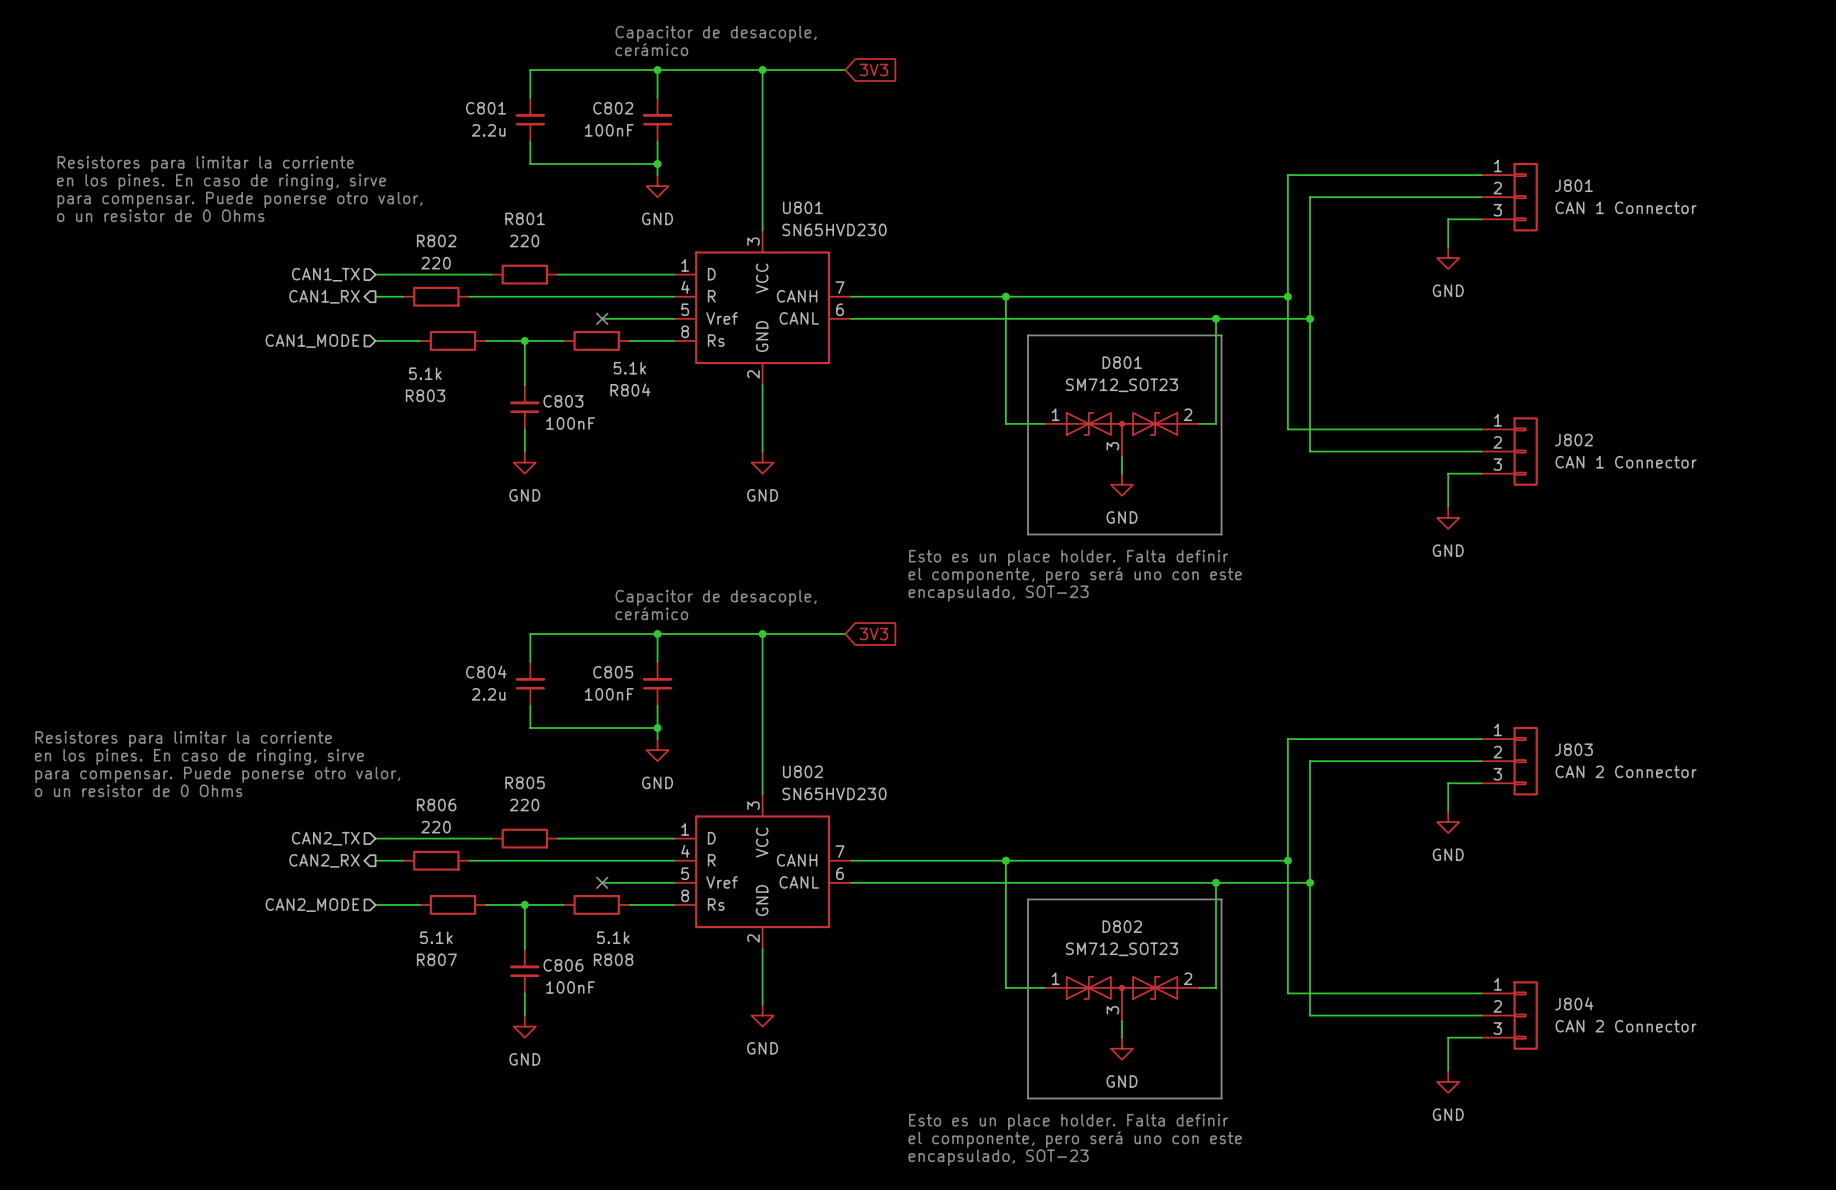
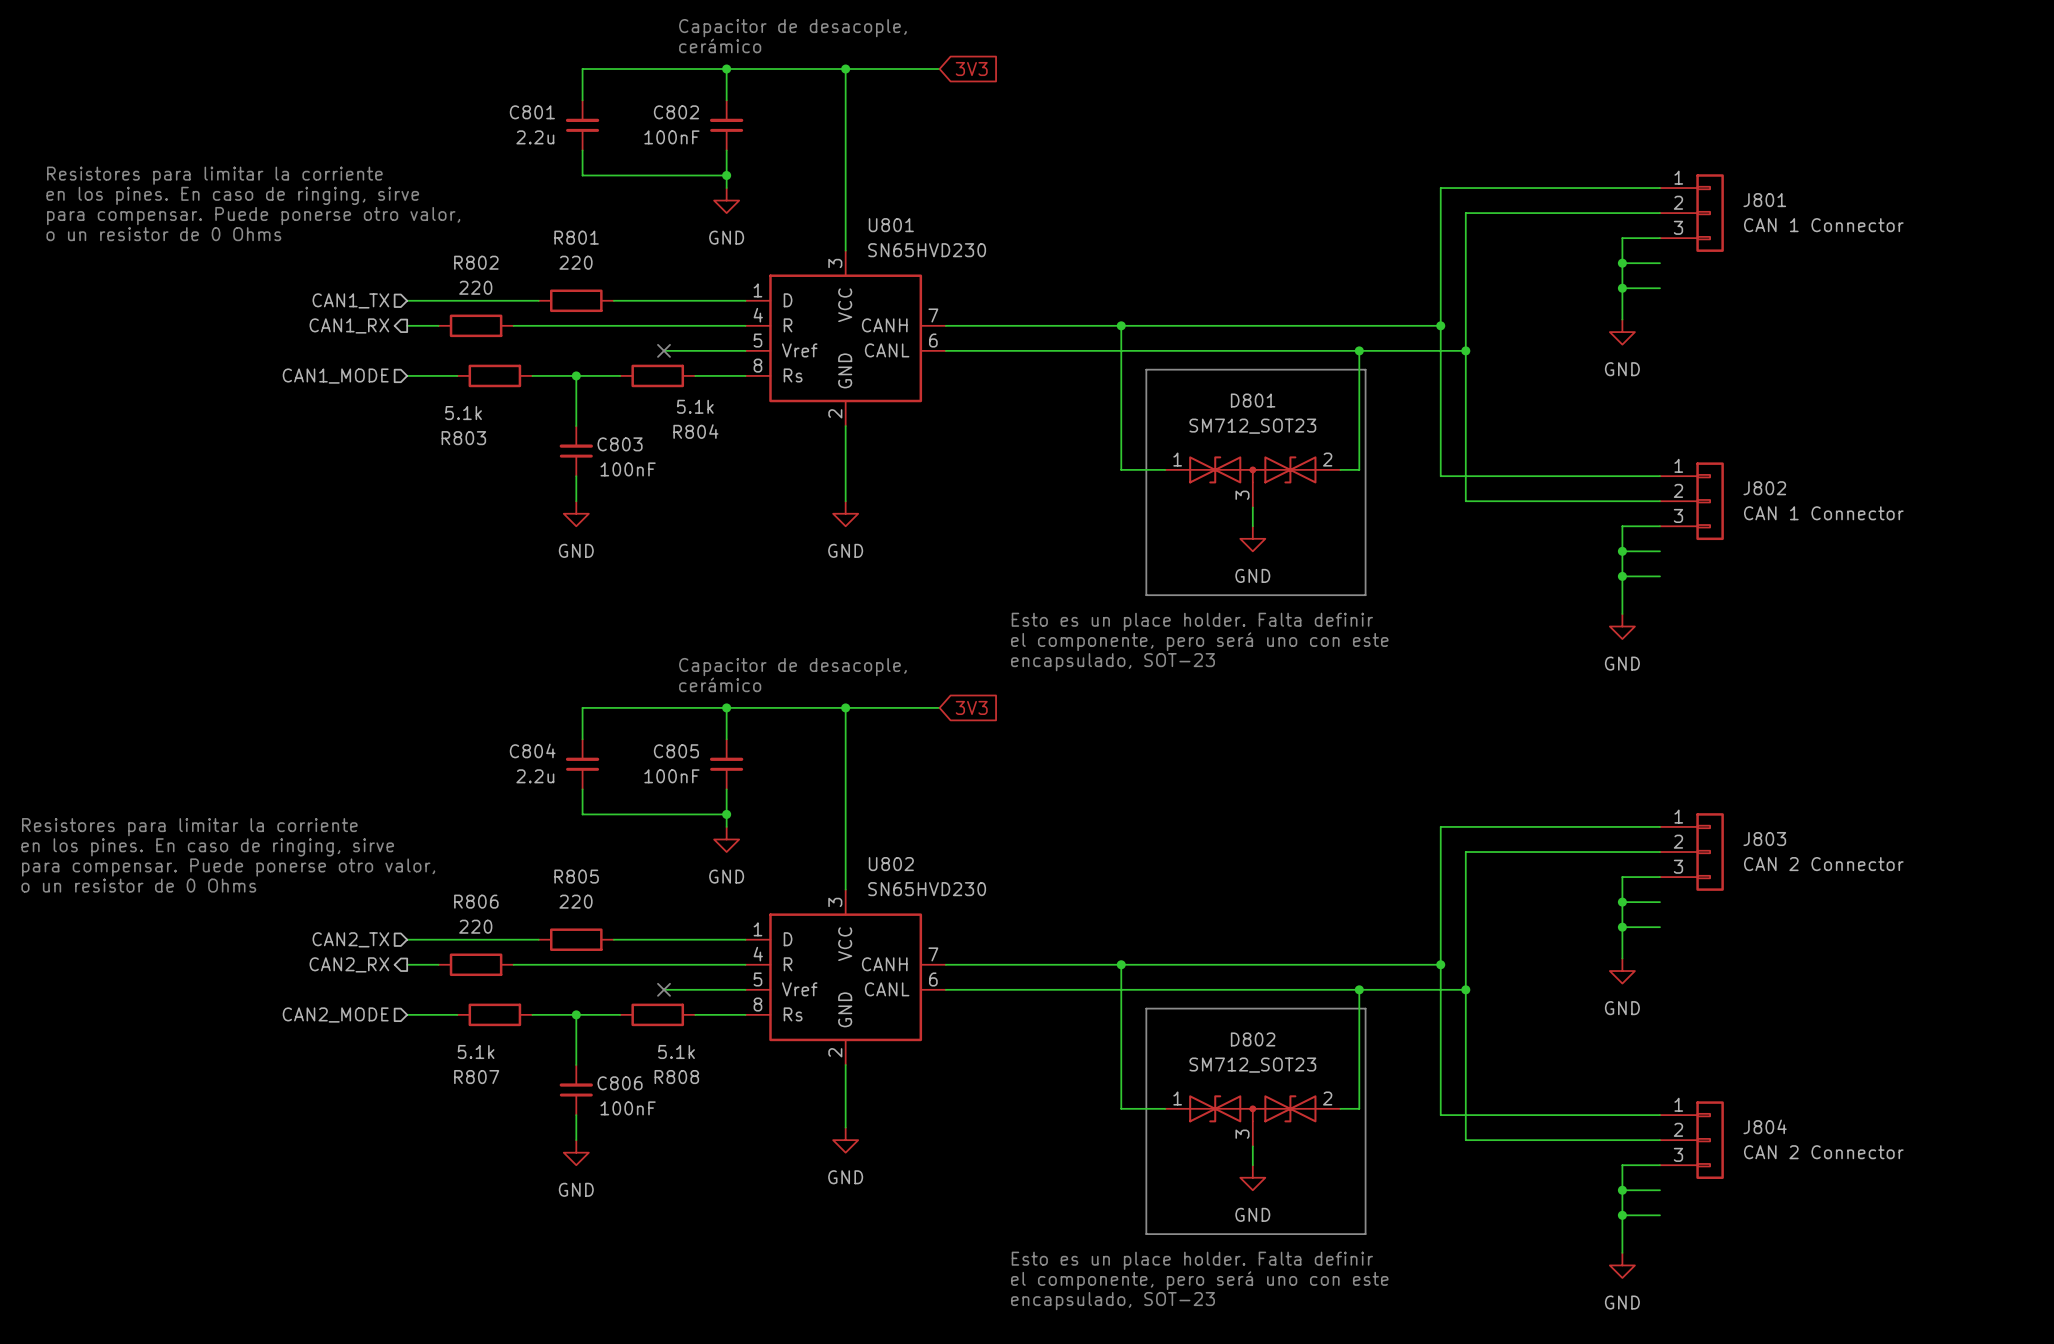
wire: none -> (1622, 263) (1659, 263)
junction: none -> (1622, 263)
wire: none -> (1622, 269) (1622, 319)
power symbol position: GND (1448, 258) -> GND (1622, 332)
wire: none -> (1622, 288) (1659, 288)
junction: none -> (1622, 288)
wire: none -> (1622, 551) (1659, 551)
junction: none -> (1622, 551)
wire: none -> (1622, 563) (1622, 613)
wire: none -> (1622, 576) (1659, 576)
power symbol position: GND (1448, 517) -> GND (1622, 626)
junction: none -> (1622, 576)
wire: none -> (1622, 902) (1659, 902)
junction: none -> (1622, 902)
wire: none -> (1622, 908) (1622, 958)
power symbol position: GND (1448, 822) -> GND (1622, 971)
wire: none -> (1622, 927) (1659, 927)
junction: none -> (1622, 927)
wire: none -> (1622, 1190) (1659, 1190)
junction: none -> (1622, 1190)
wire: none -> (1622, 1202) (1622, 1252)
wire: none -> (1622, 1215) (1659, 1215)
power symbol position: GND (1448, 1081) -> GND (1622, 1265)
junction: none -> (1622, 1215)

